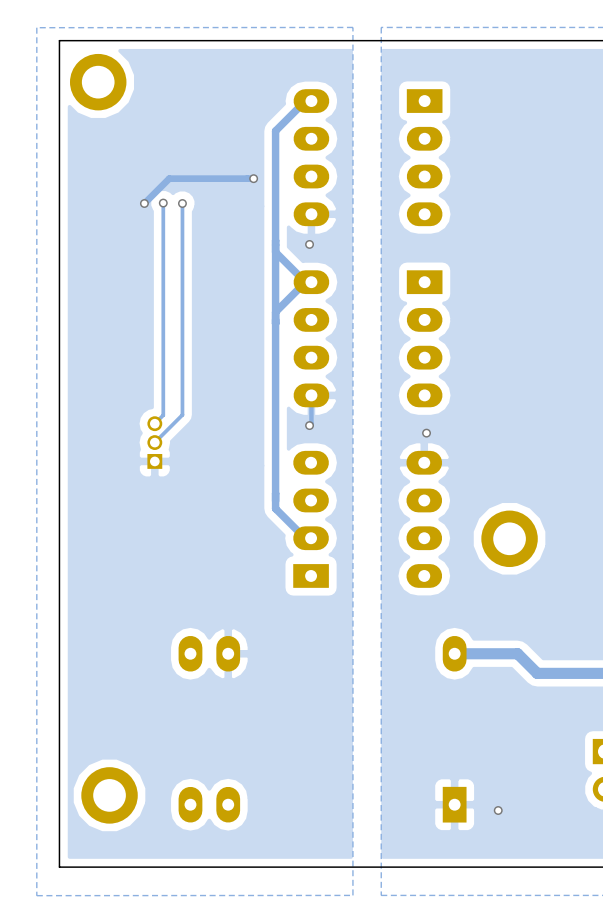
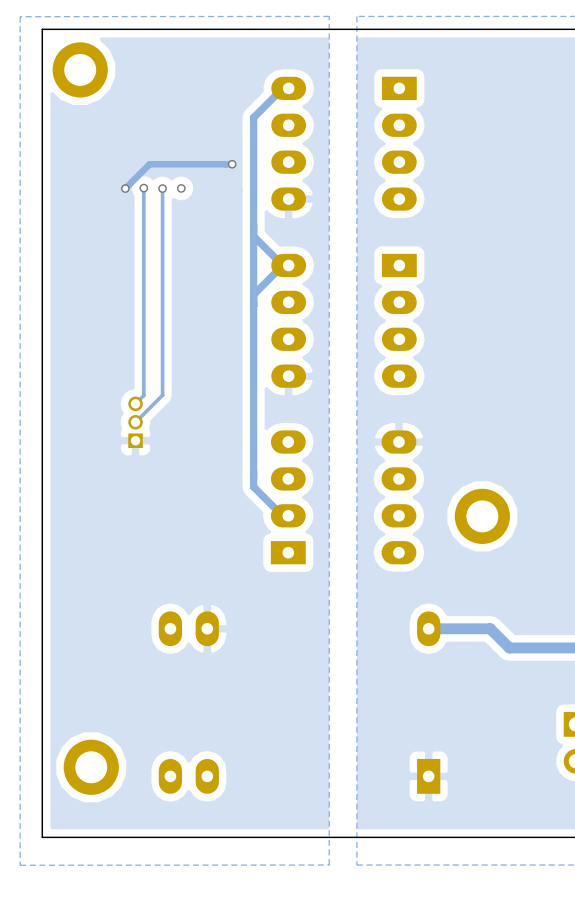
via: none -> (181, 188)
via: (309, 244) -> none
track: (311, 395) (311, 423) (309, 425) -> none
via: (309, 425) -> none
via: (426, 433) -> none
via: (498, 810) -> none

